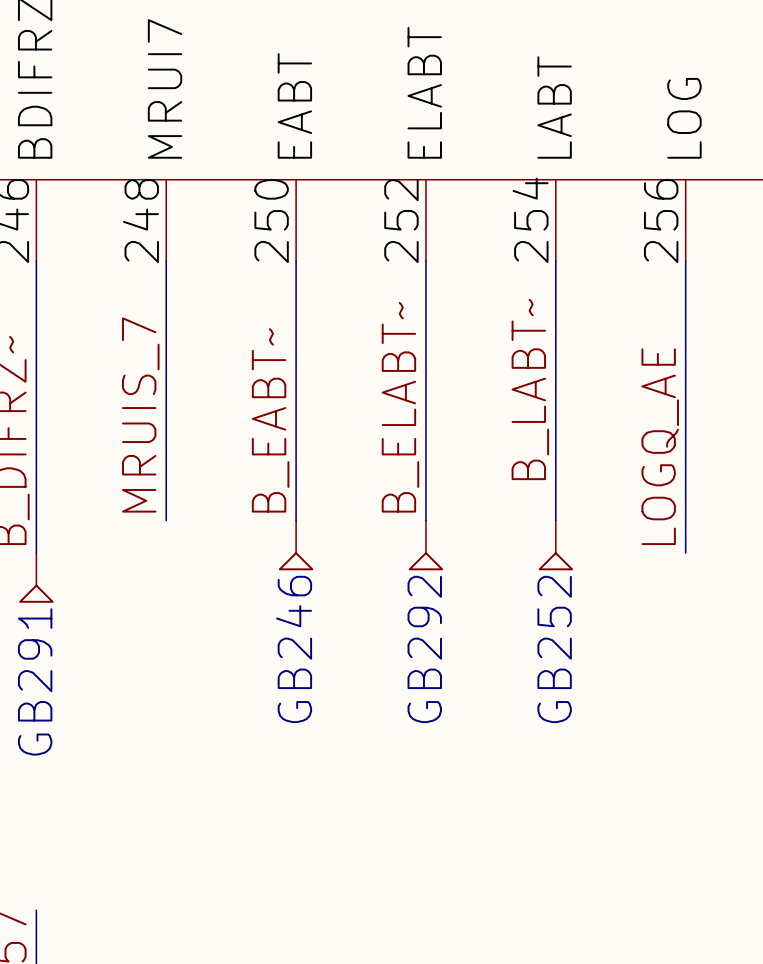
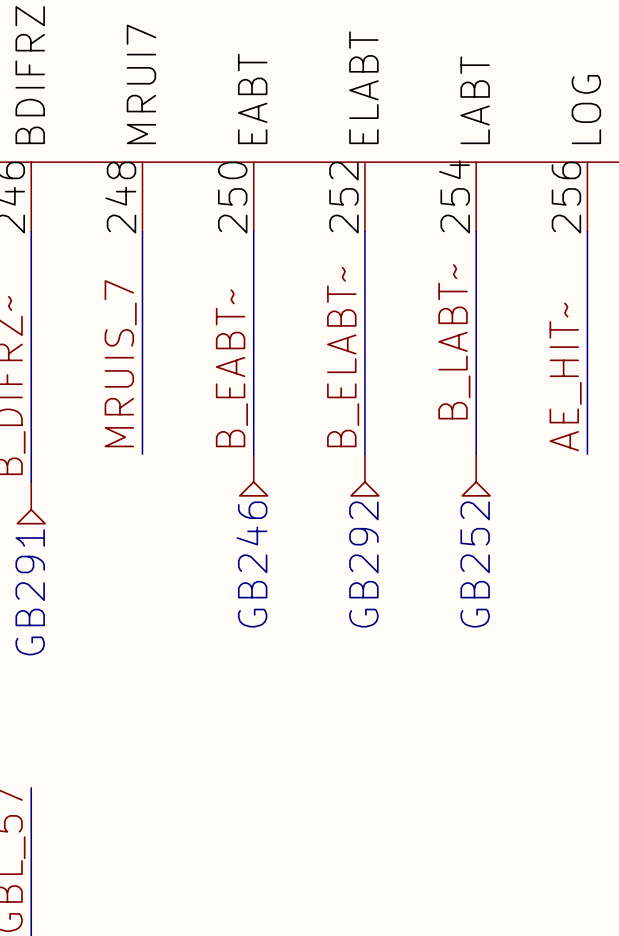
label: none -> AE_HIT~ (565, 376)
label: LOGQ_AE (660, 446) -> none
wire: (685, 520) (685, 553) -> none

